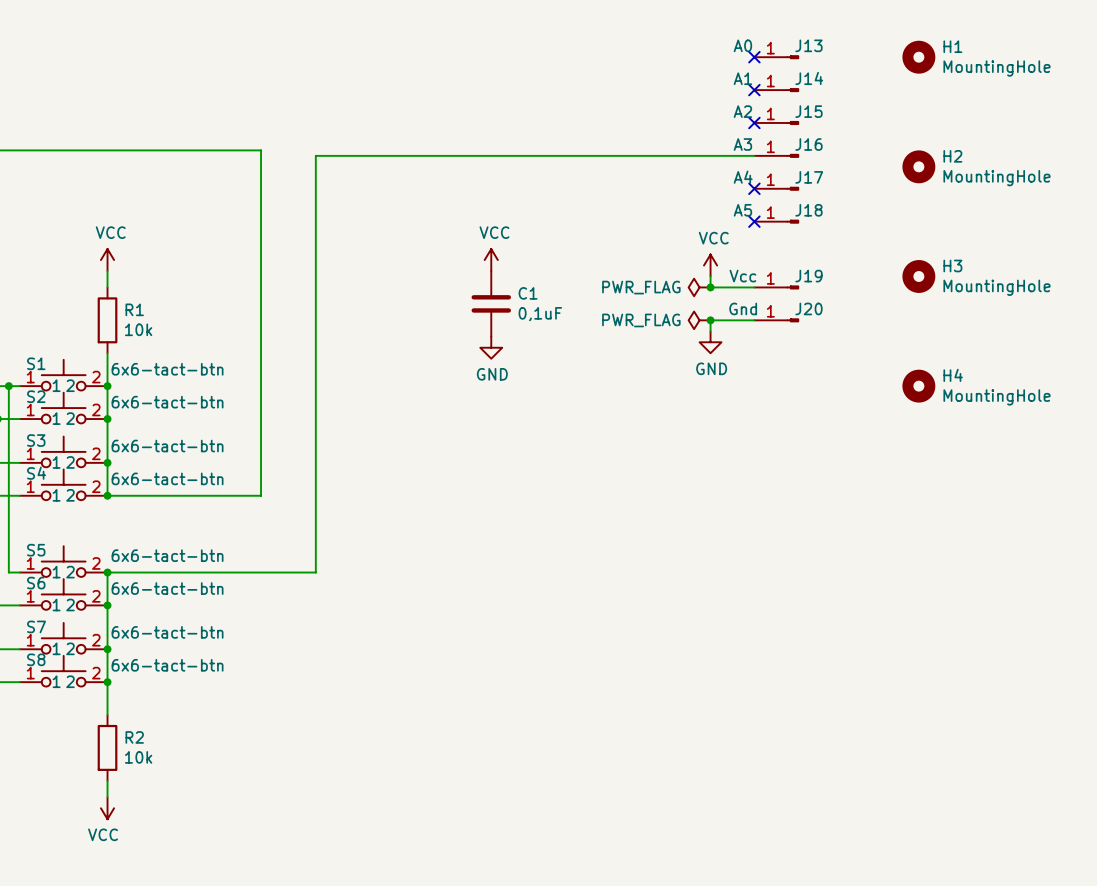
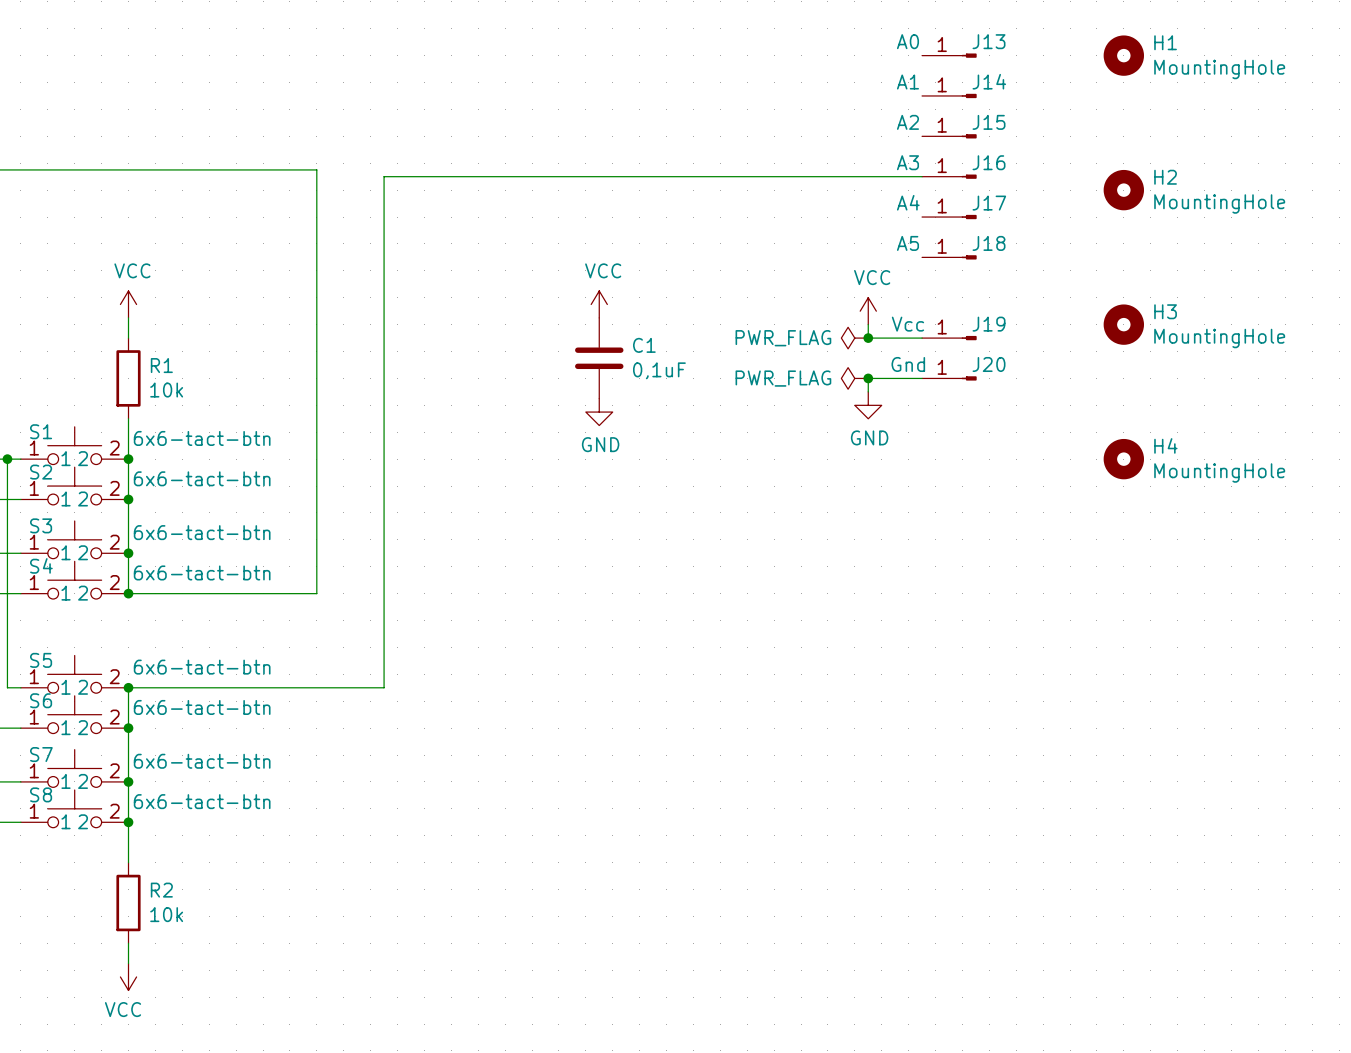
no-connect mark: (754, 57) -> none
no-connect mark: (754, 90) -> none
no-connect mark: (754, 122) -> none
no-connect mark: (754, 188) -> none
no-connect mark: (754, 221) -> none

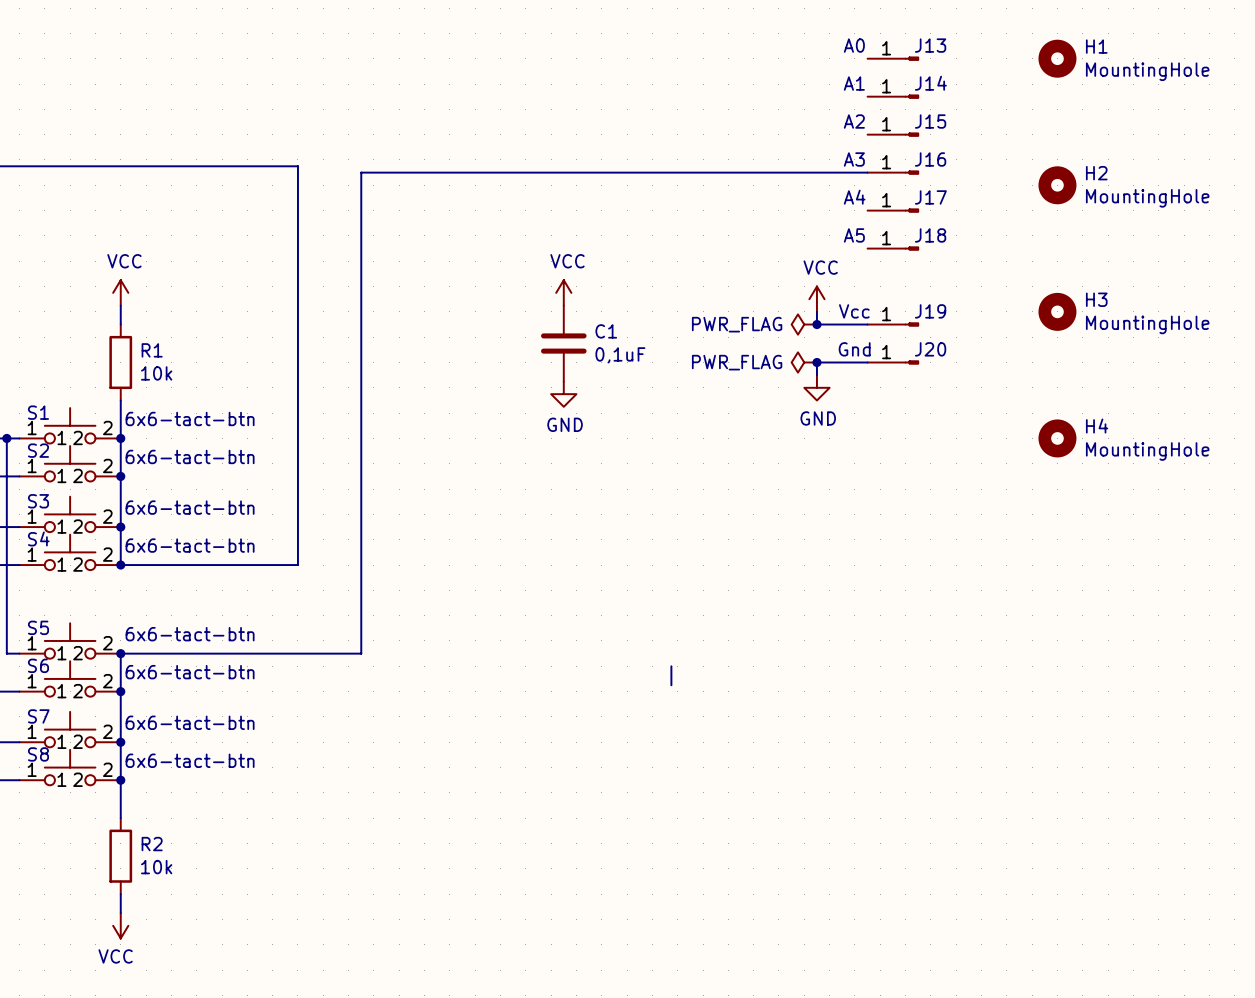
wire: none -> (671, 666) (671, 685)

